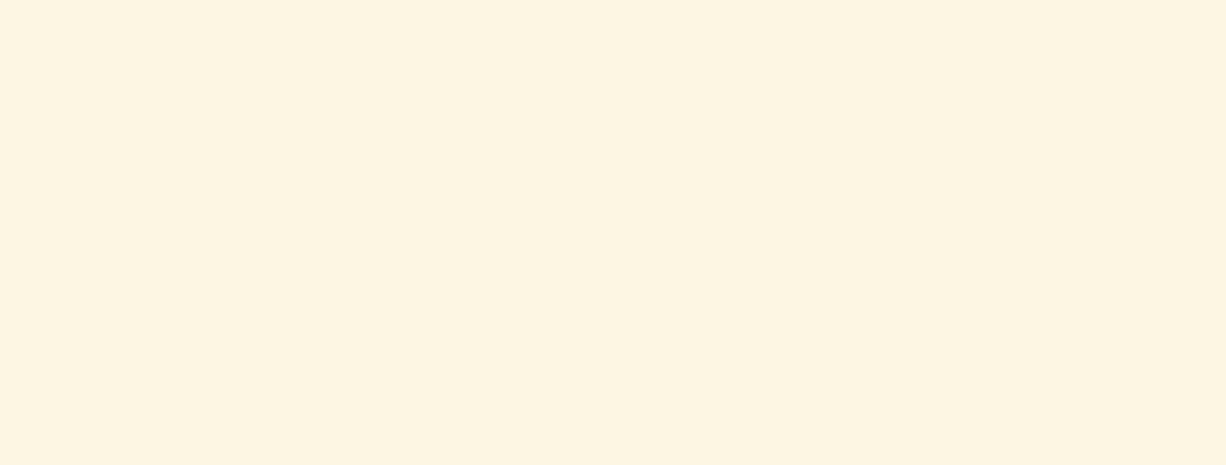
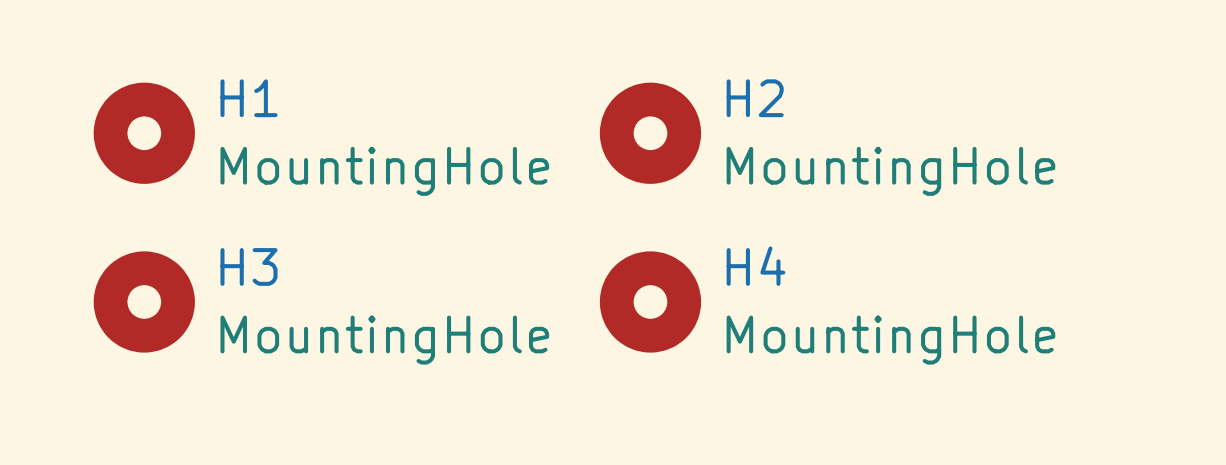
H1: none -> MountingHole (144, 133)
H2: none -> MountingHole (650, 133)
H3: none -> MountingHole (144, 301)
H4: none -> MountingHole (650, 301)

